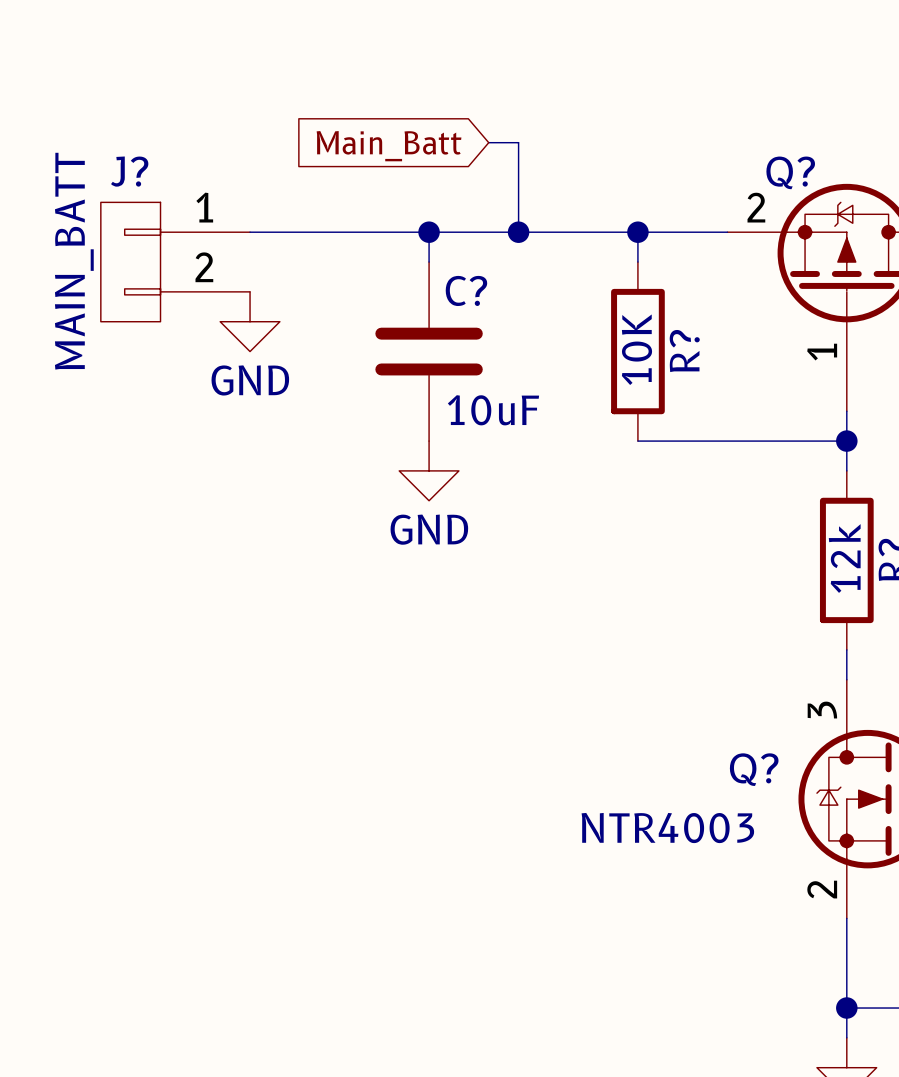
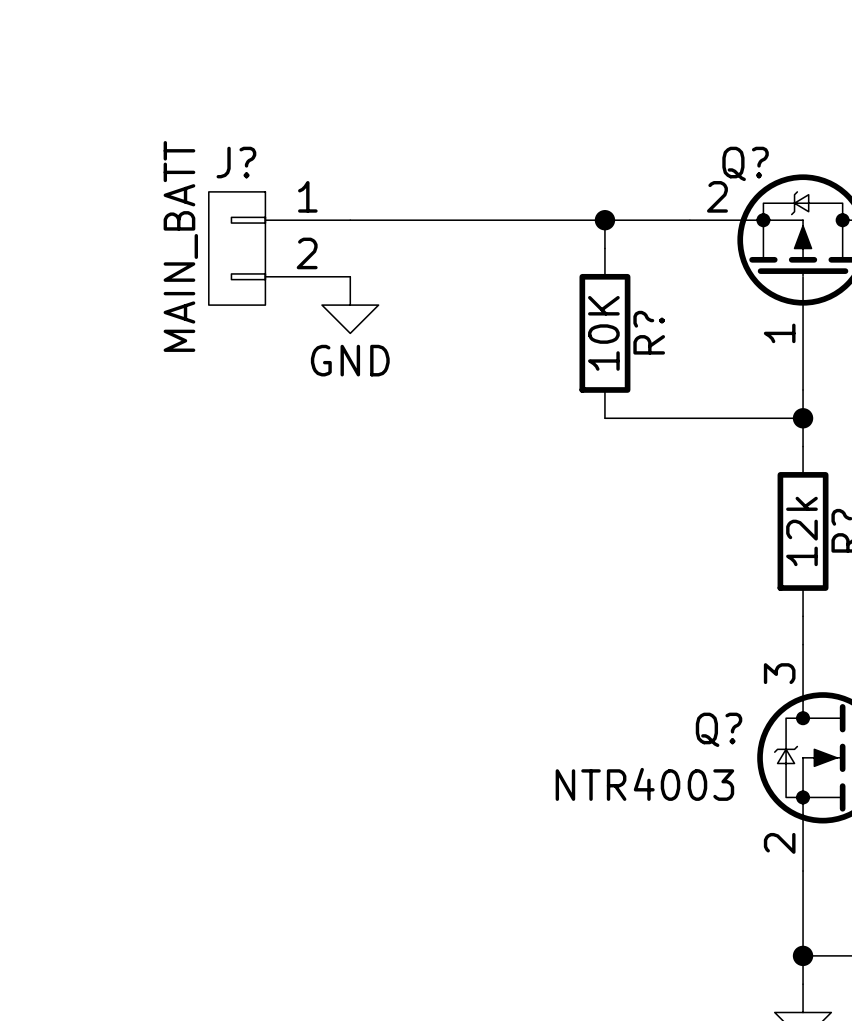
wire: (488, 142) (518, 142) (518, 232) -> none
global label: Main_Batt (389, 146) -> none
wire: (429, 232) (429, 262) -> none
junction: (429, 232) -> none
junction: (518, 232) -> none
J? position: (175, 262) -> (279, 248)
power symbol: GND (250, 321) -> none
power symbol: none -> GND (350, 305)
C?: 10uF (429, 351) -> none
power symbol: GND (429, 470) -> none

